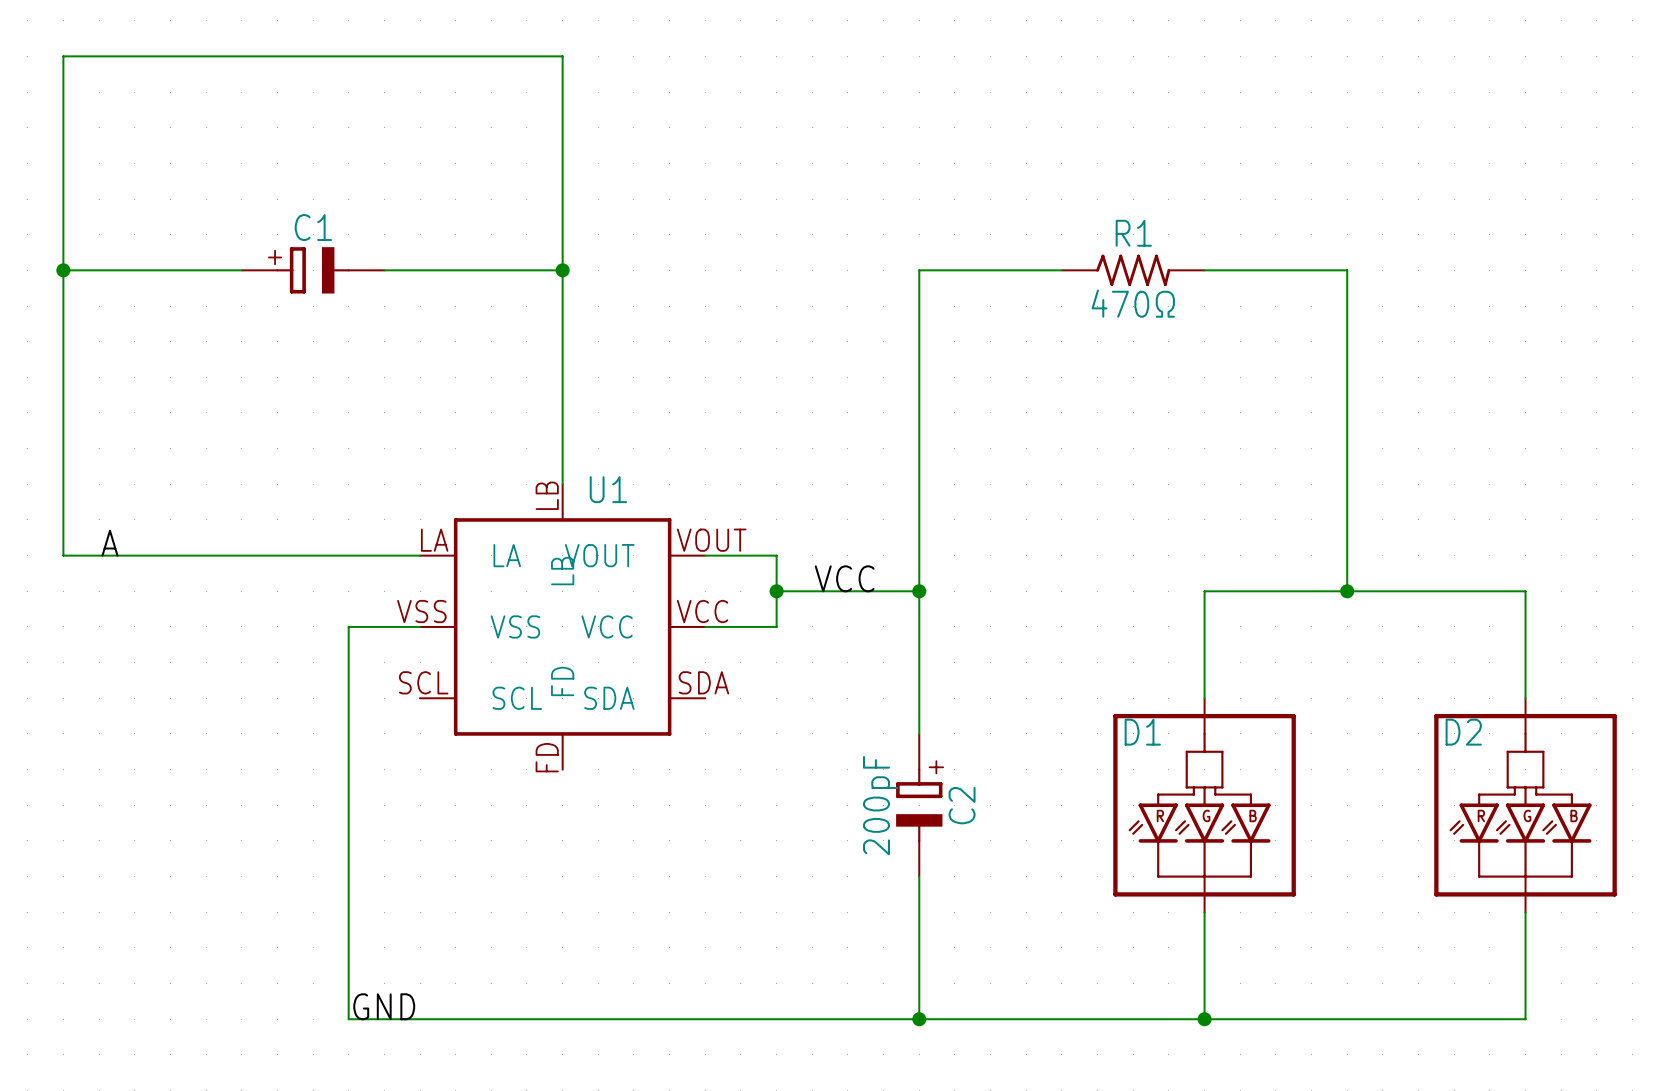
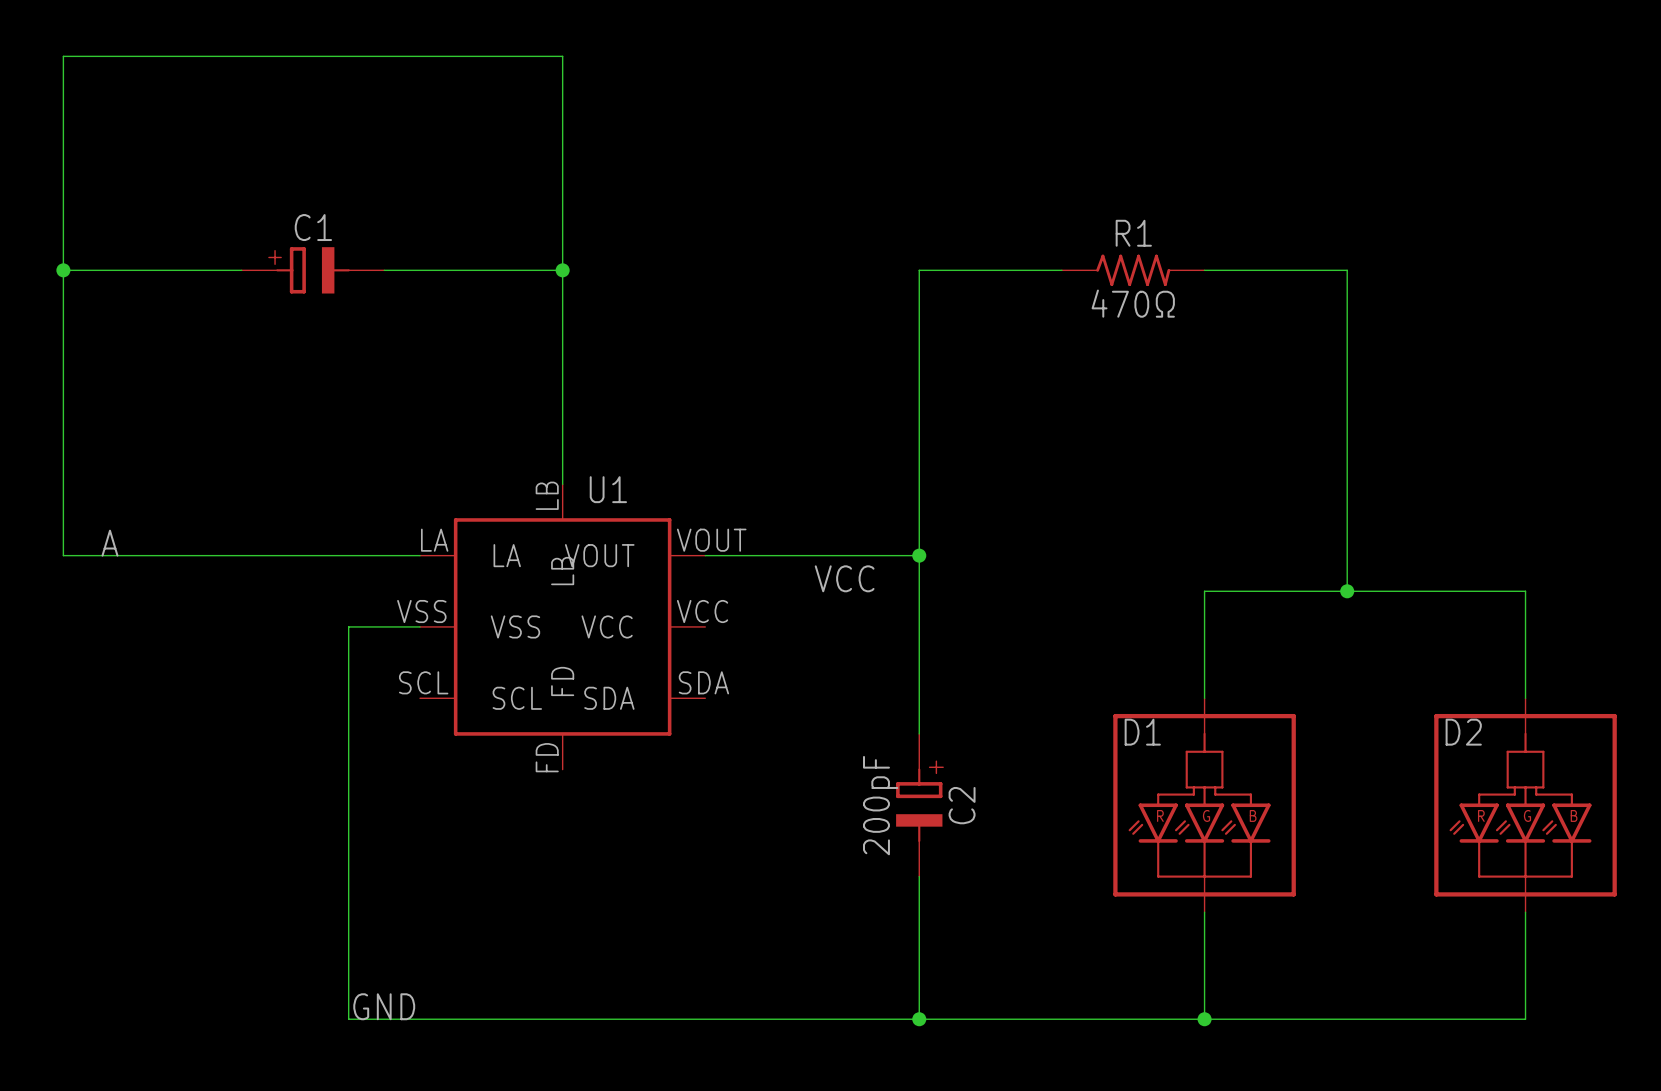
wire: (776, 555) (776, 626) (705, 626) -> (776, 555) (919, 555)
wire: (776, 591) (919, 591) -> none
junction: (776, 591) -> none
junction position: (919, 591) -> (919, 555)

